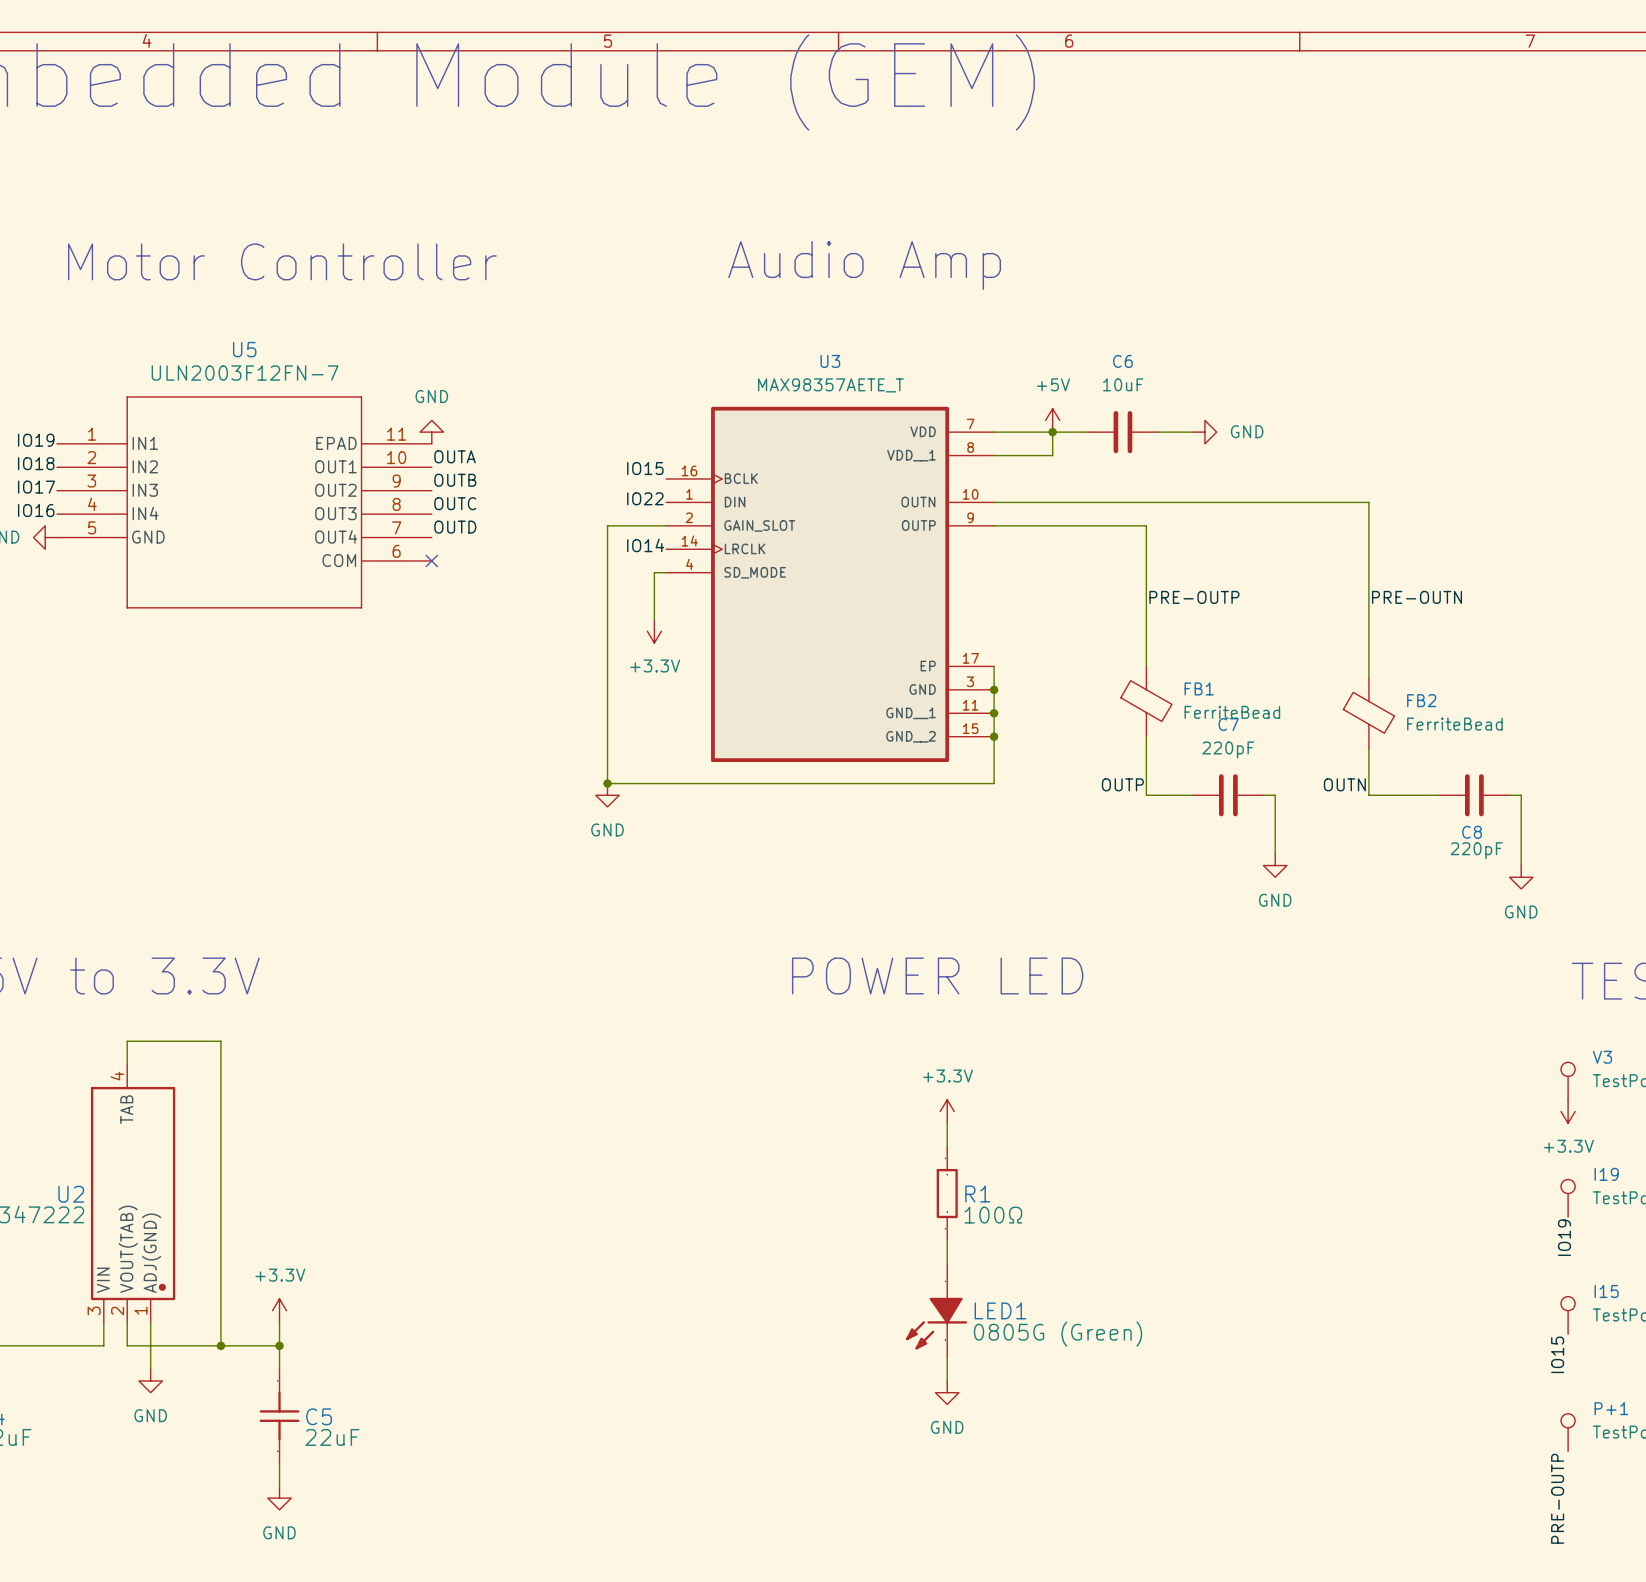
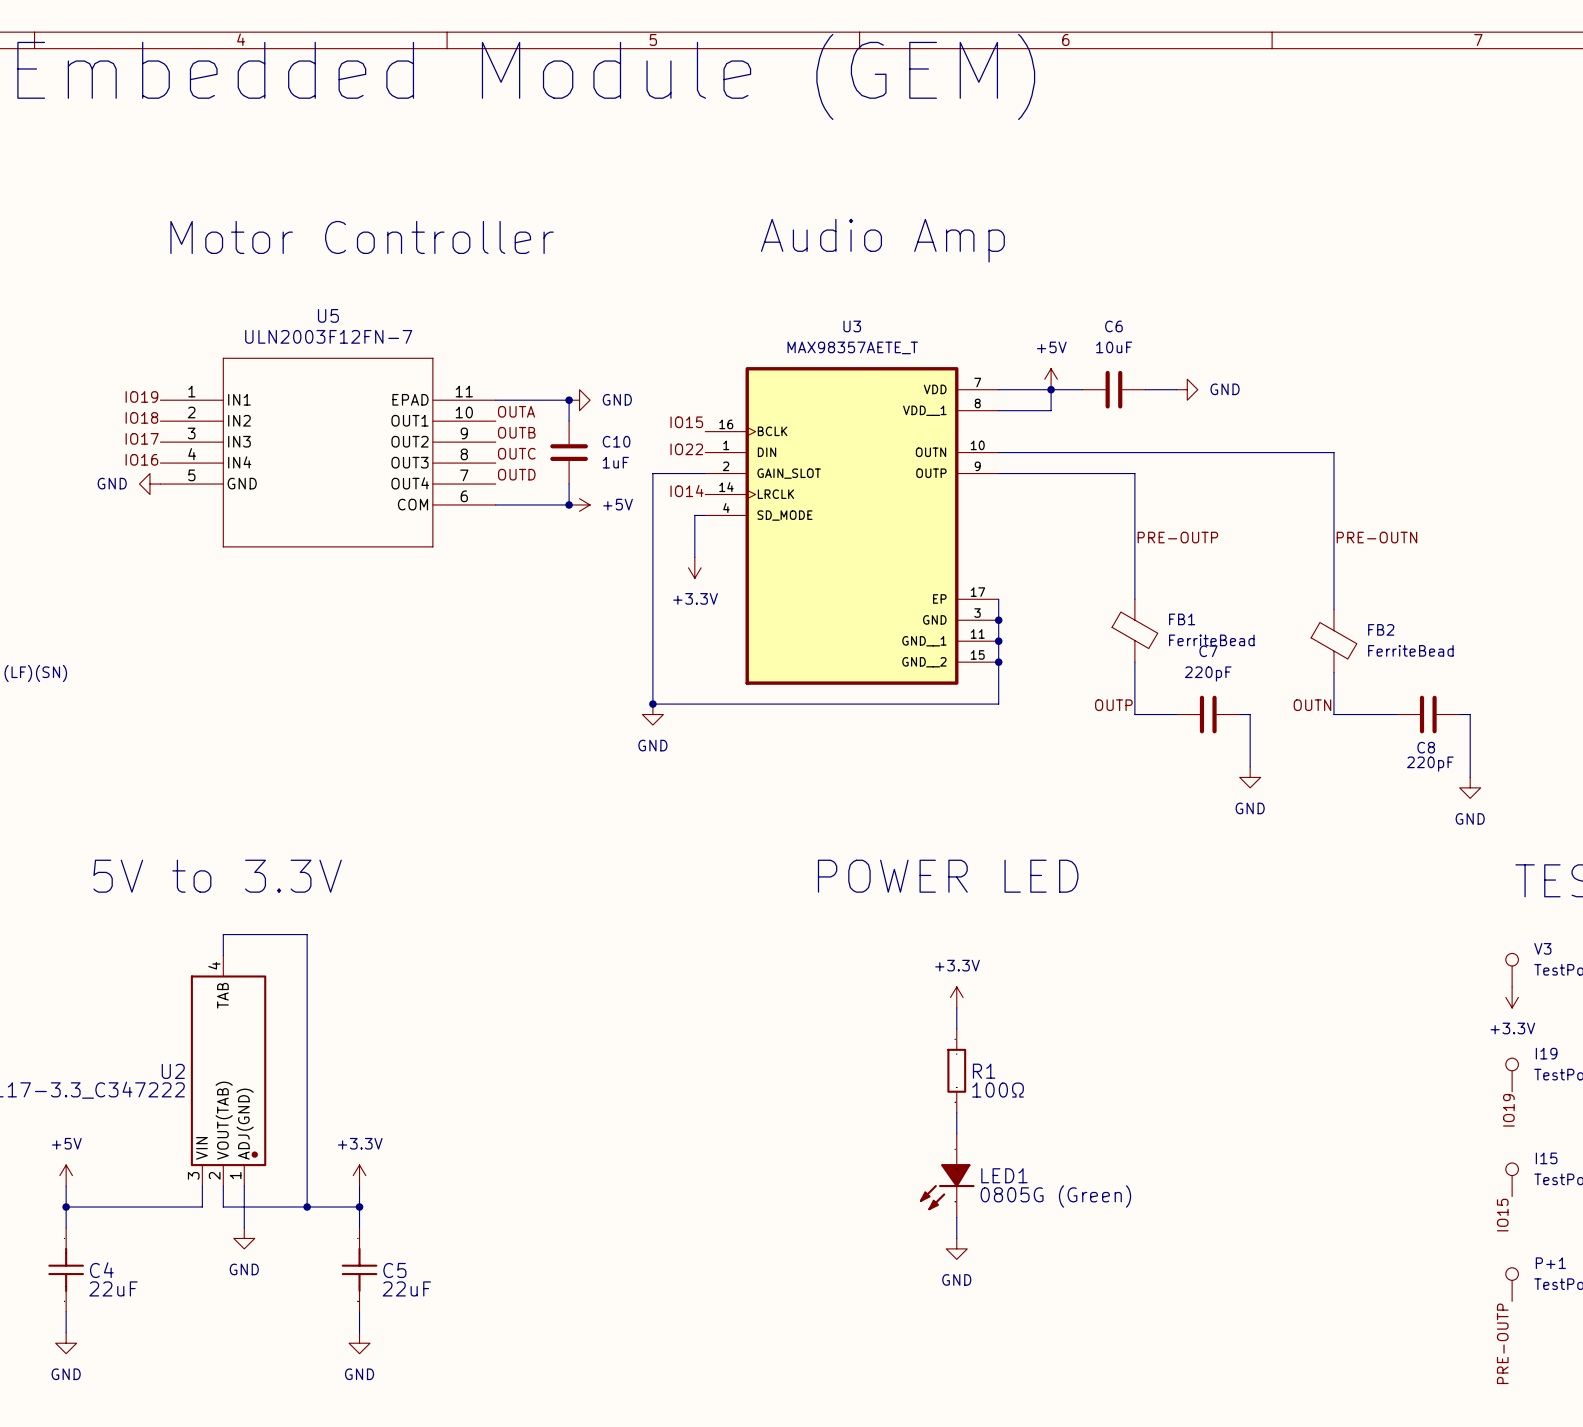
power symbol rotation: 0° (431, 432) -> 90° clockwise (579, 400)
power symbol position: GND (431, 432) -> GND (579, 400)
wire: none -> (495, 400) (569, 400) (569, 421)
junction: none -> (569, 400)
C10: none -> 1uF (569, 452)
wire: none -> (569, 484) (569, 504) (495, 504)
no-connect mark: (431, 560) -> none
junction: none -> (569, 504)
power symbol: none -> +5V (579, 504)

